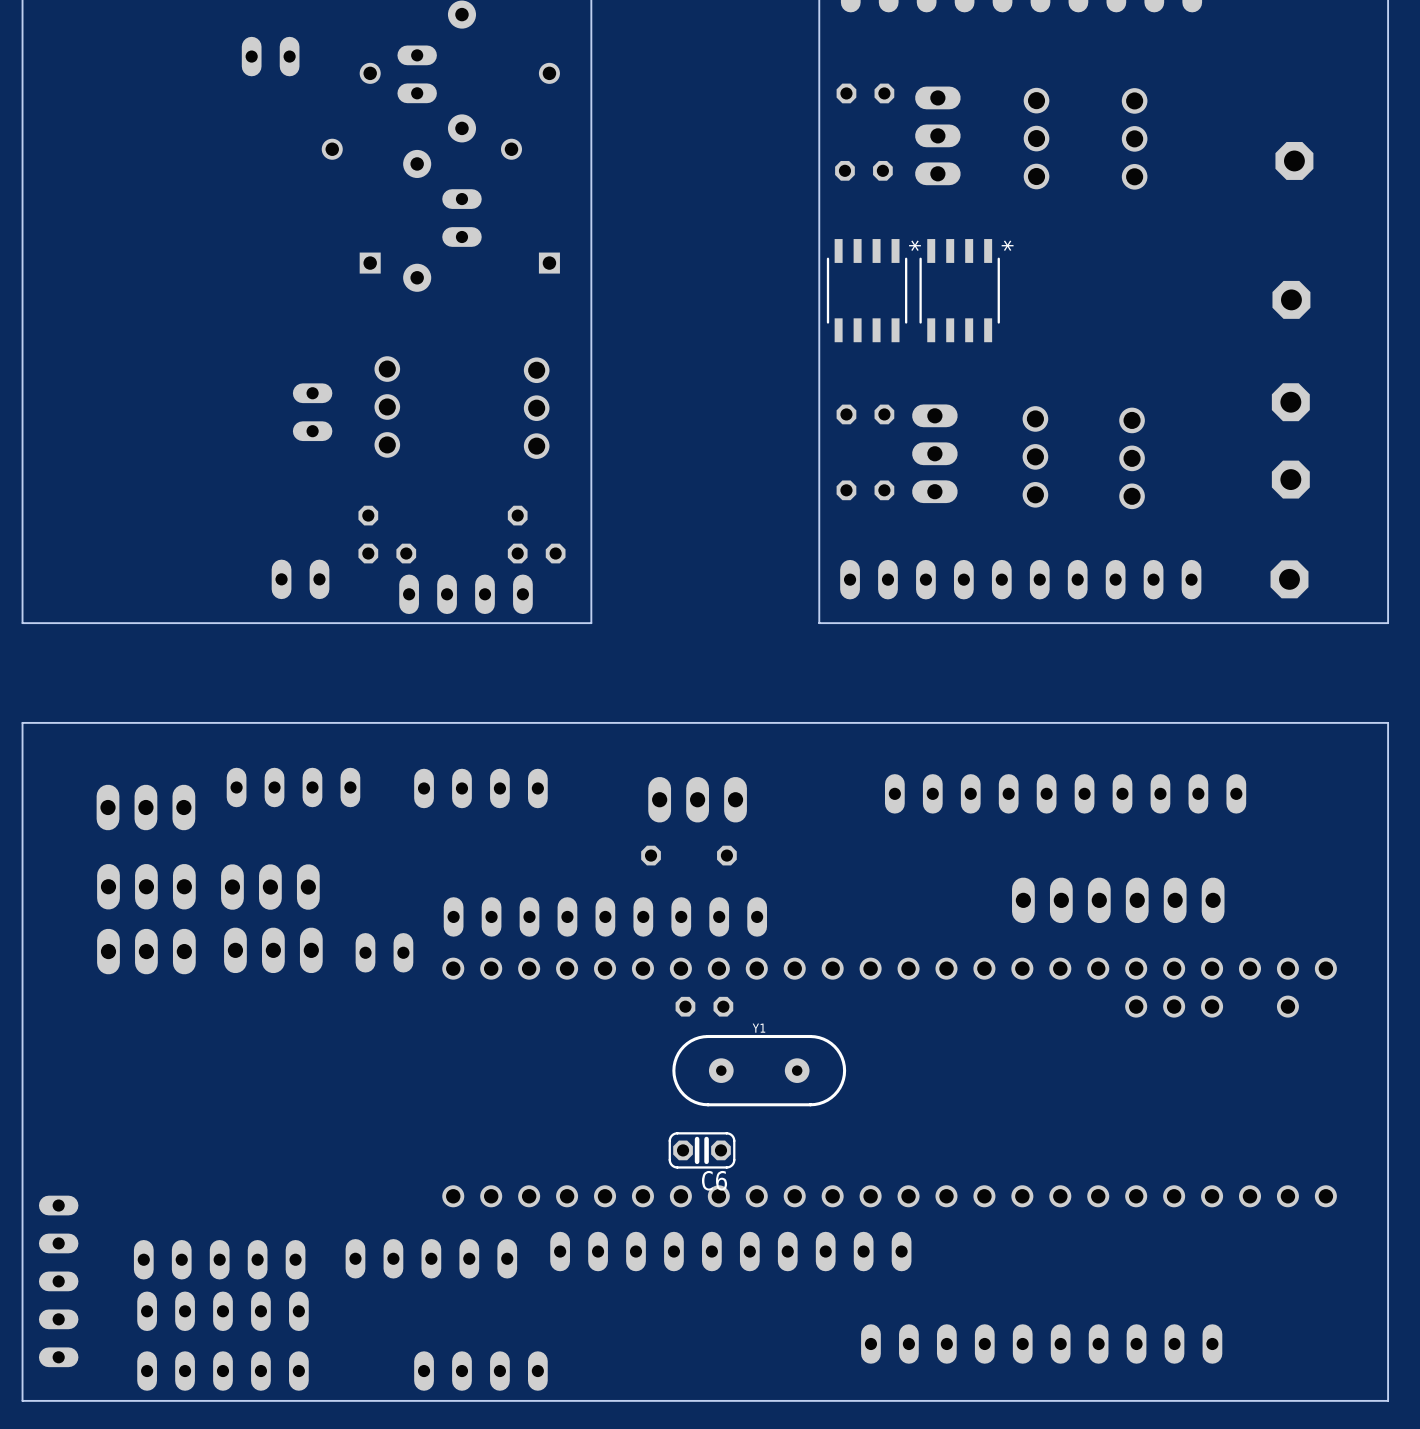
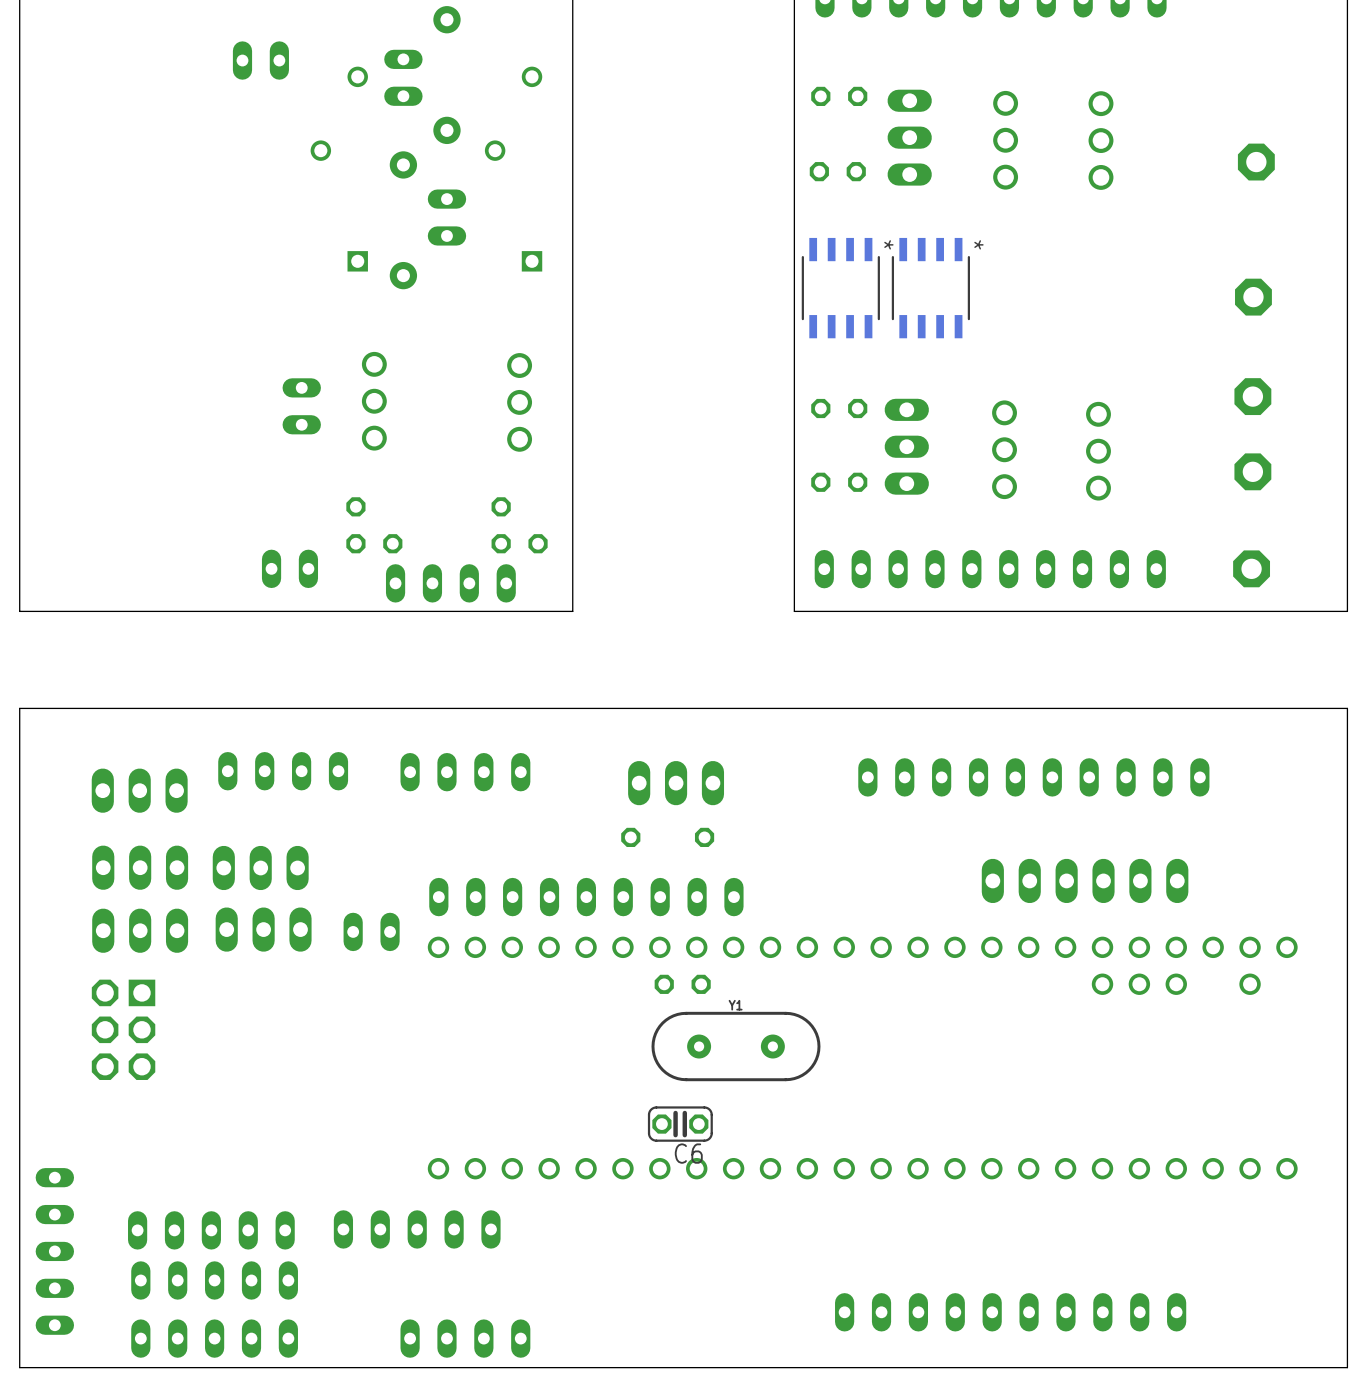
part: none -> (123, 1029)
part: (730, 1251) -> none

